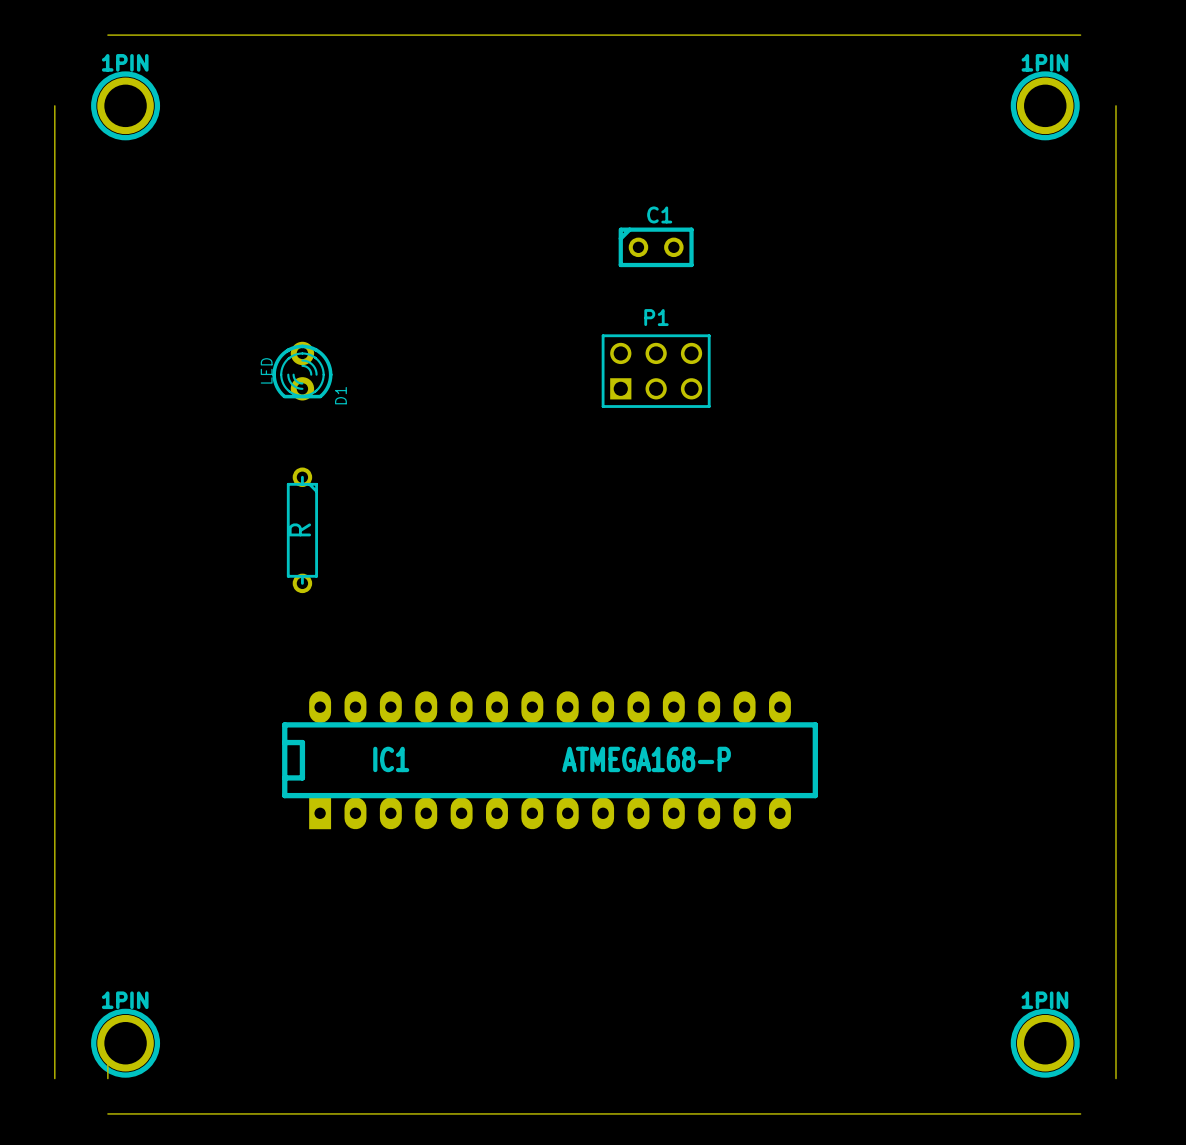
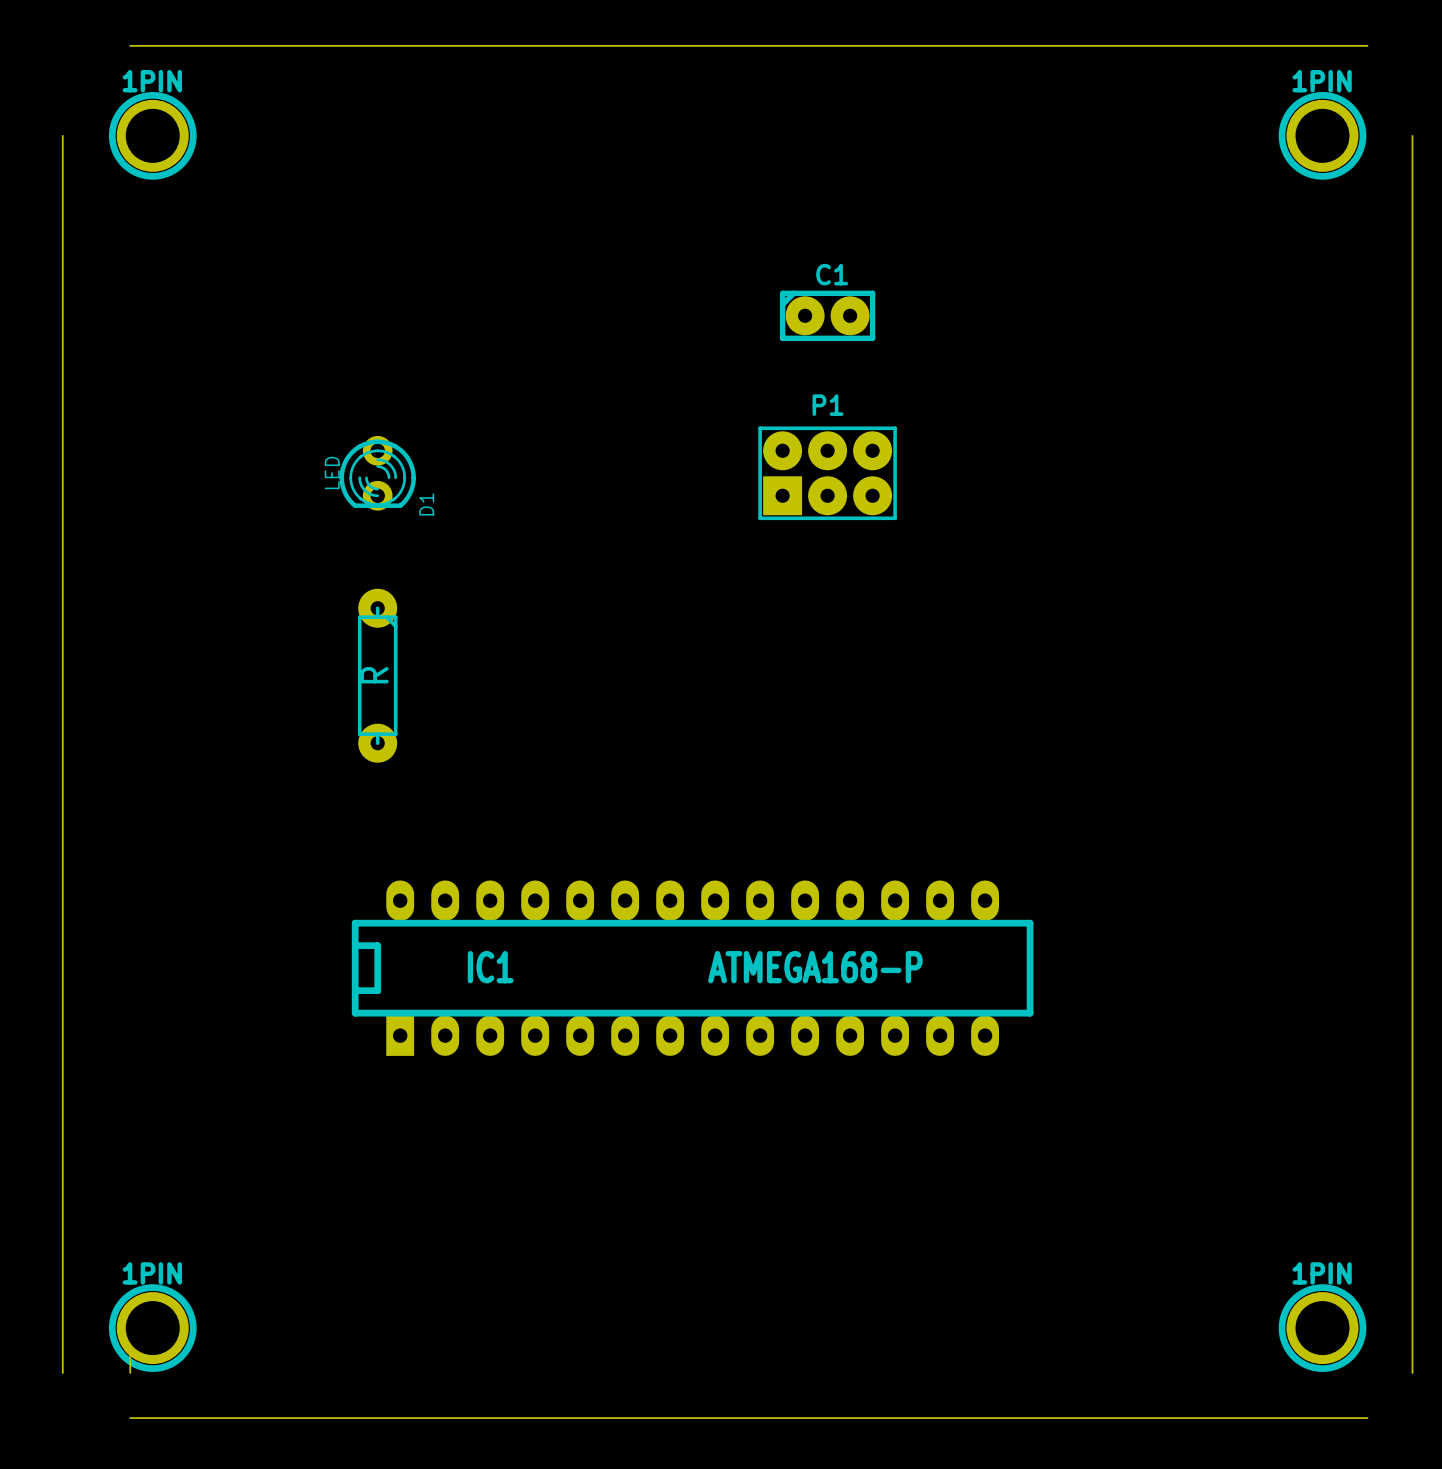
C1 footprint: [618, 227, 694, 268] -> [779, 290, 876, 342]
P1 footprint: [601, 334, 711, 408] -> [758, 426, 897, 521]
part footprint: [286, 467, 318, 594] -> [357, 588, 398, 763]

